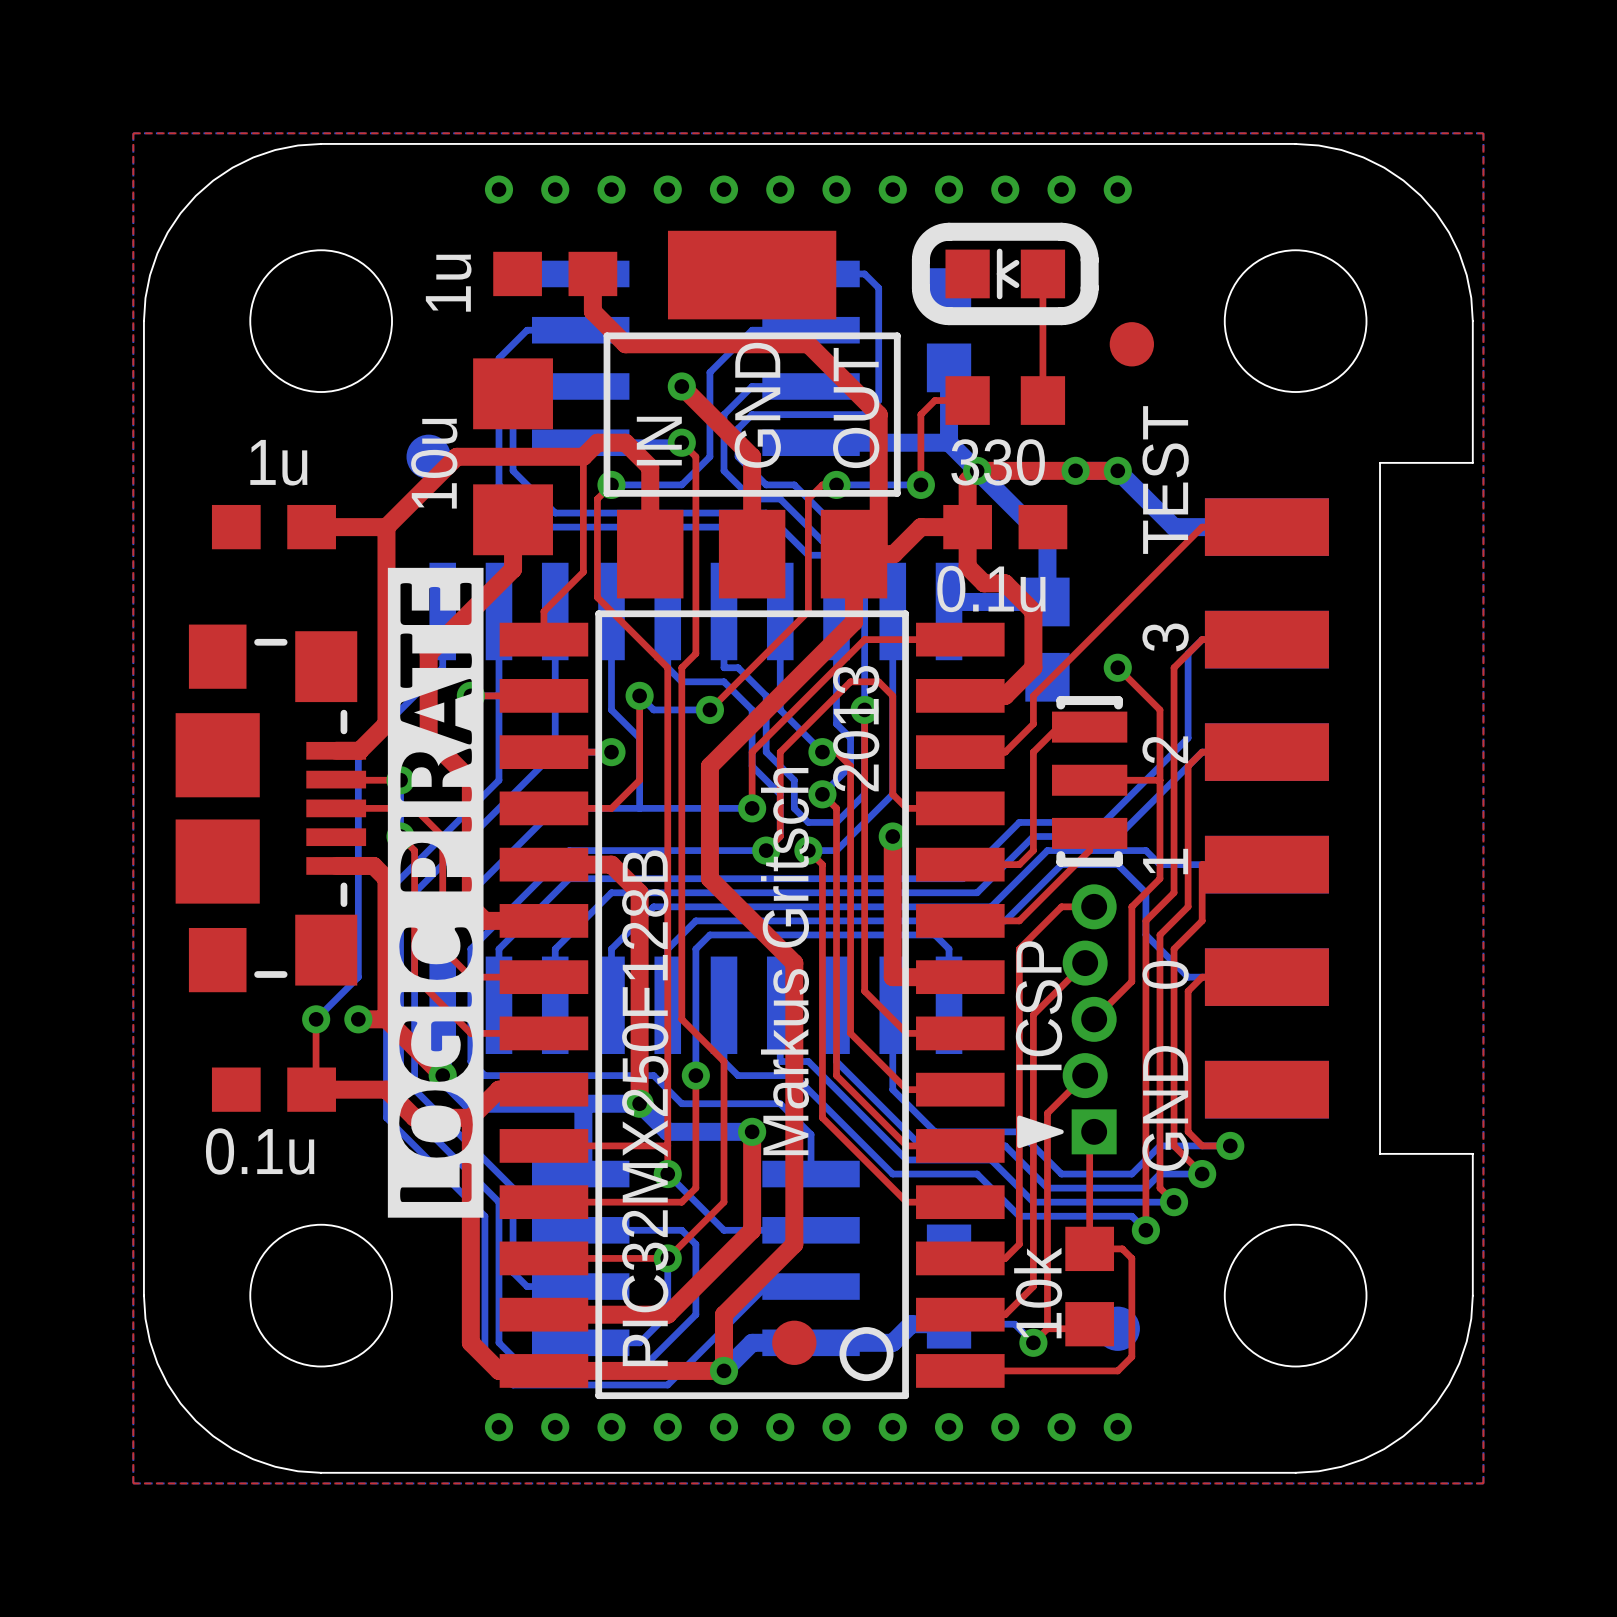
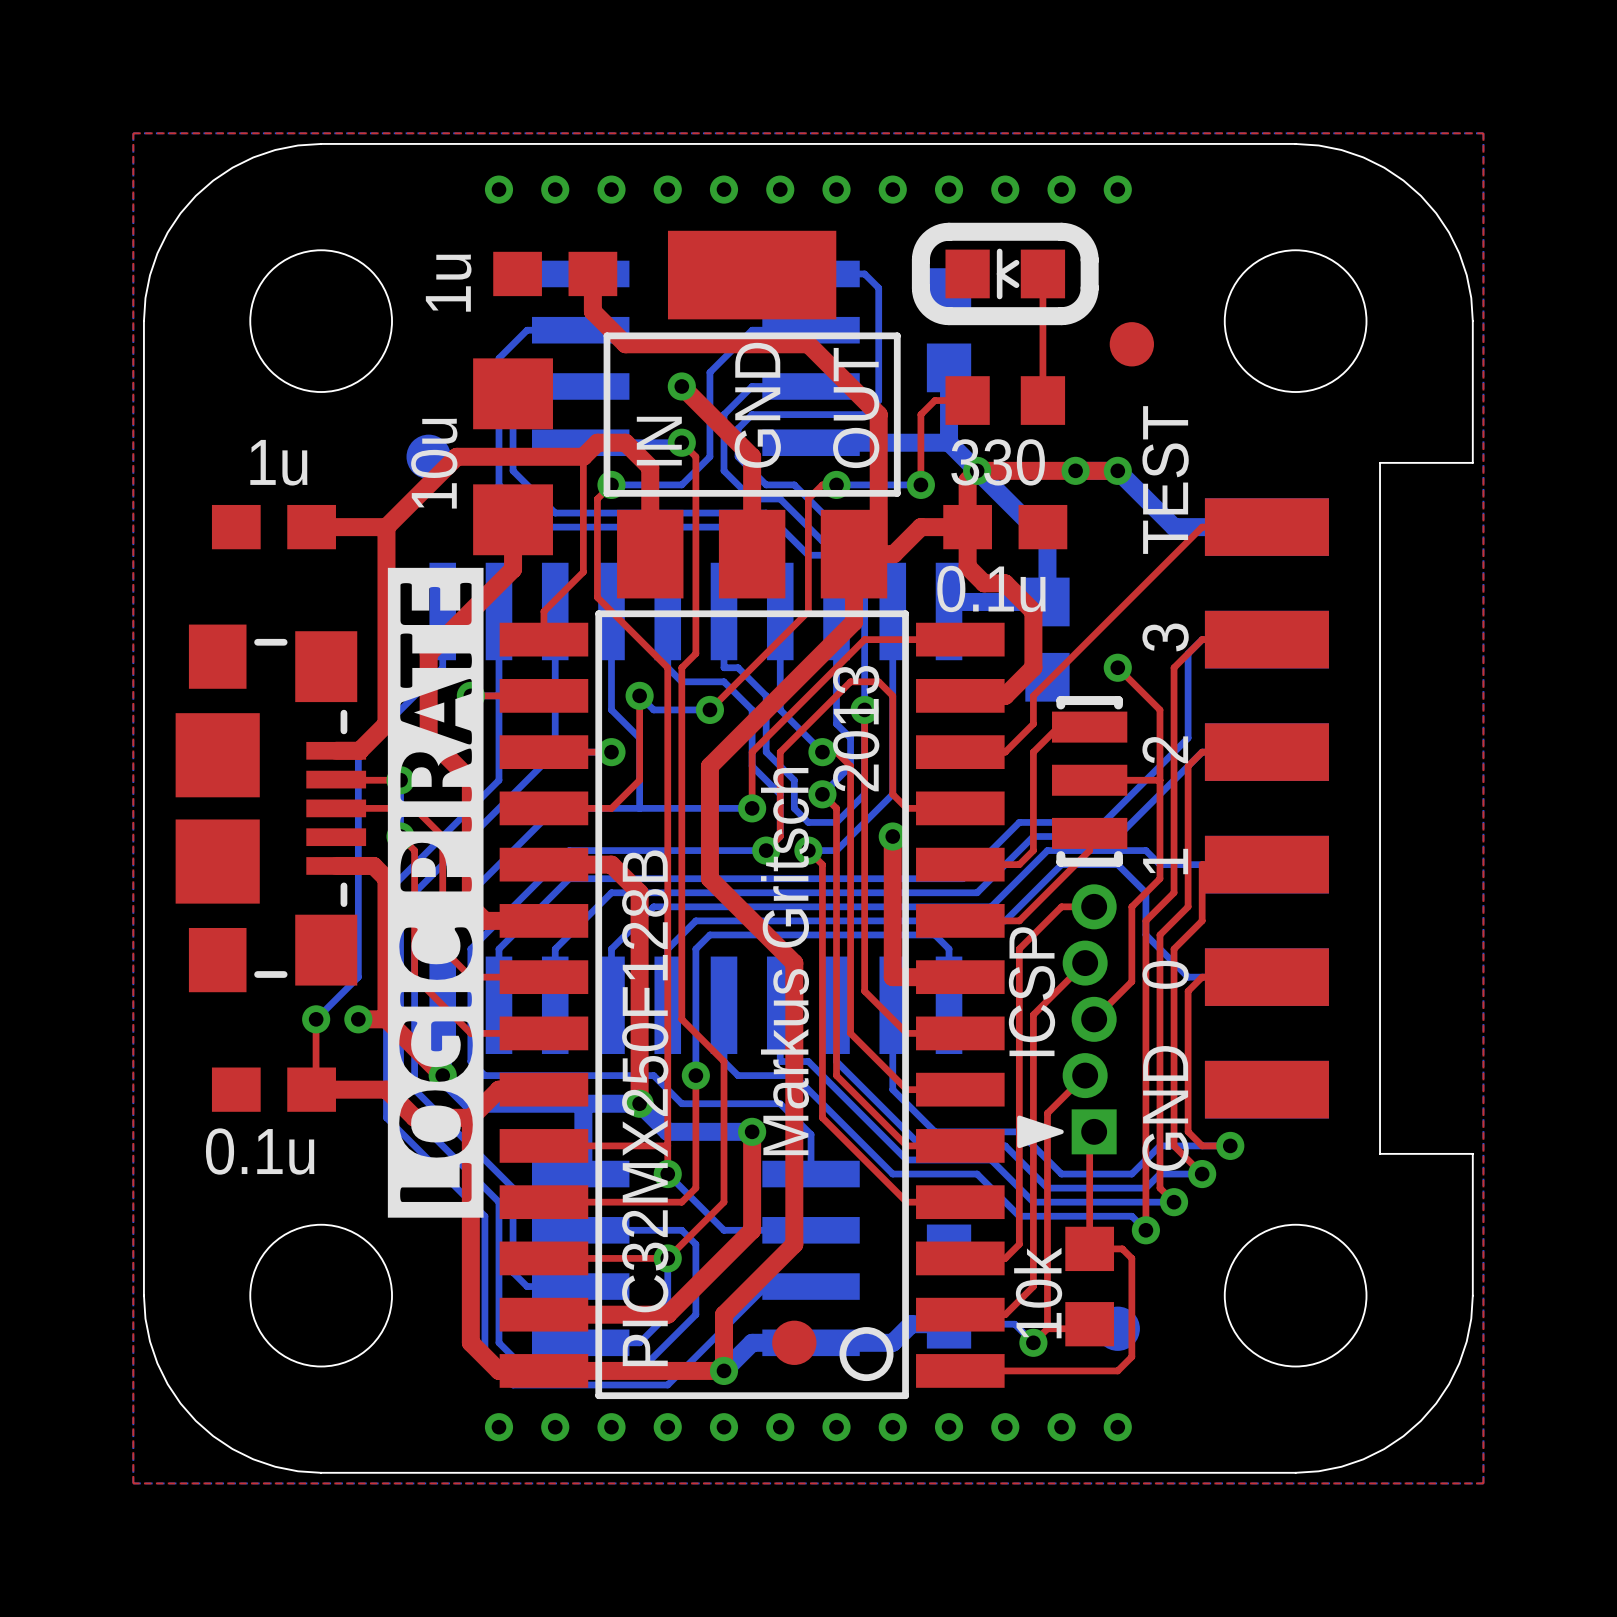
text position: ICSP (1039, 1005) -> ICSP (1031, 991)

